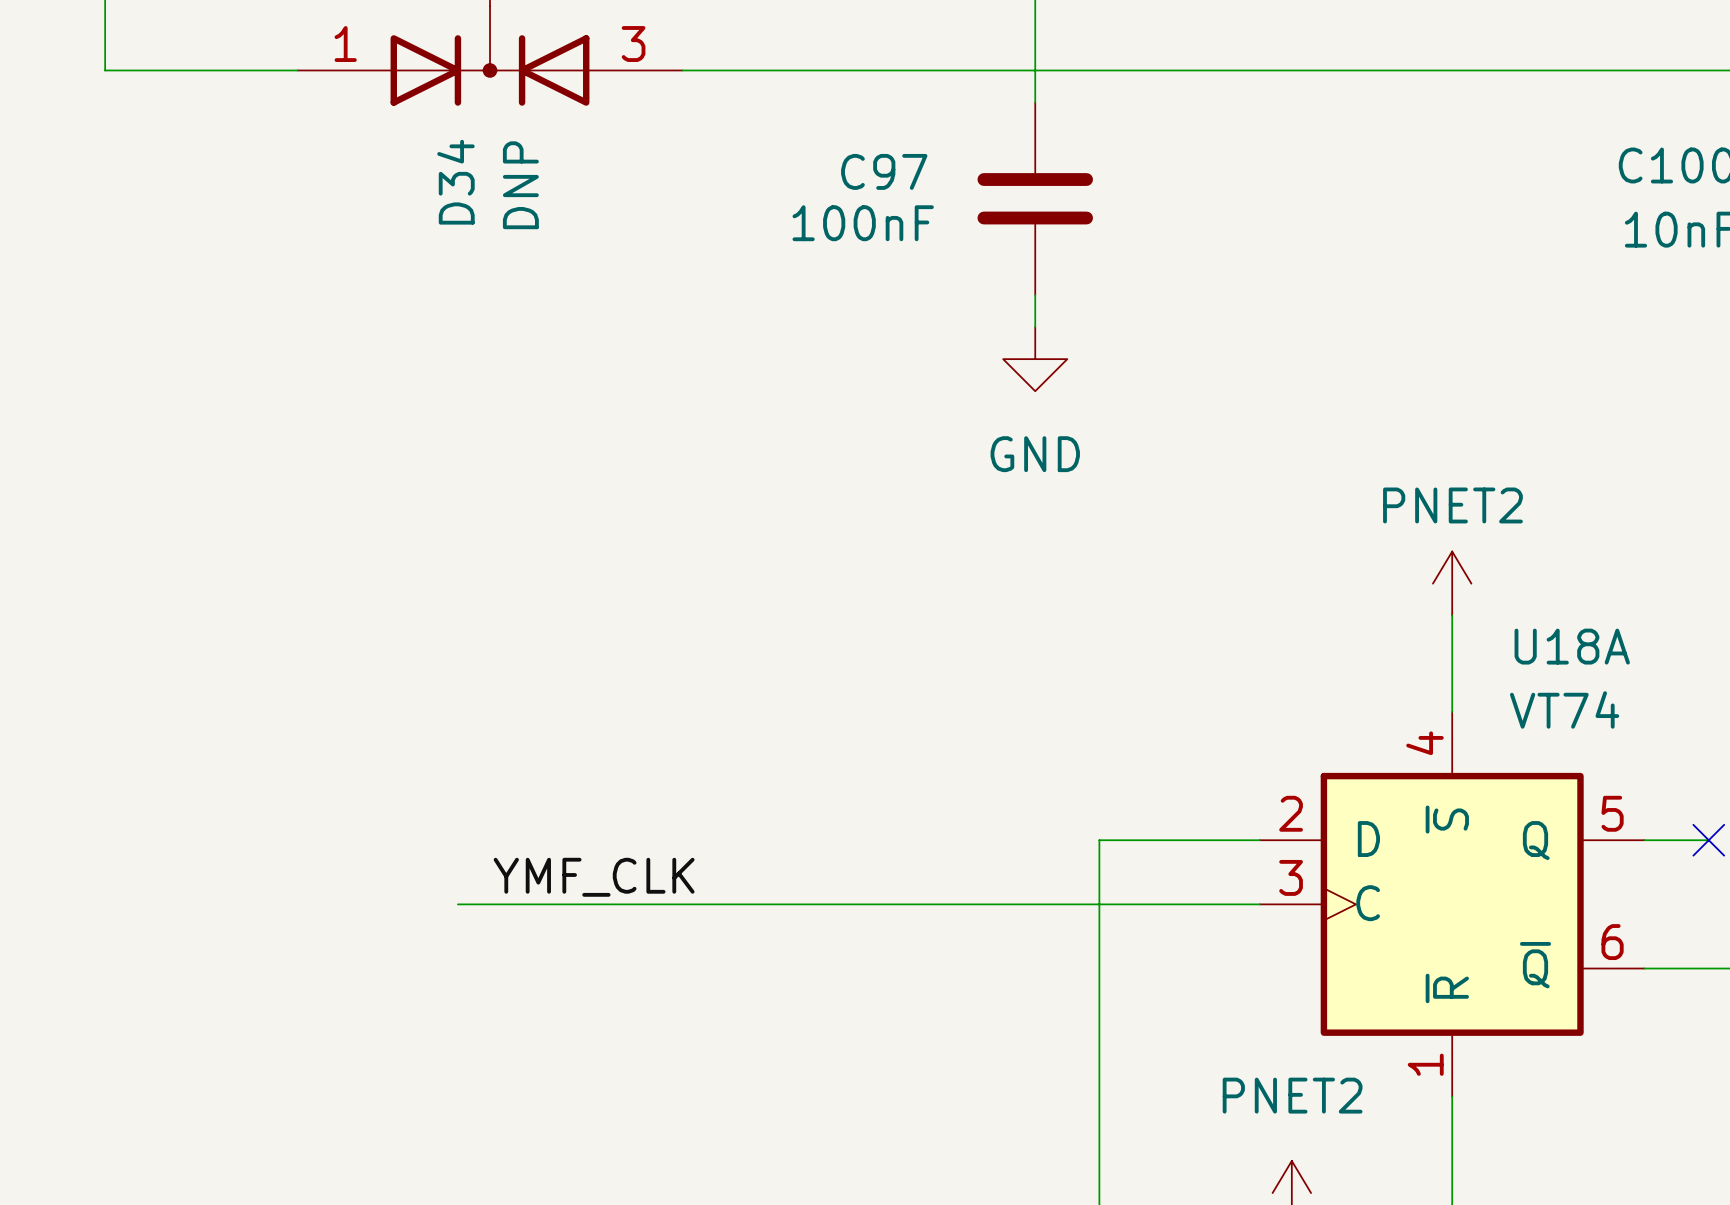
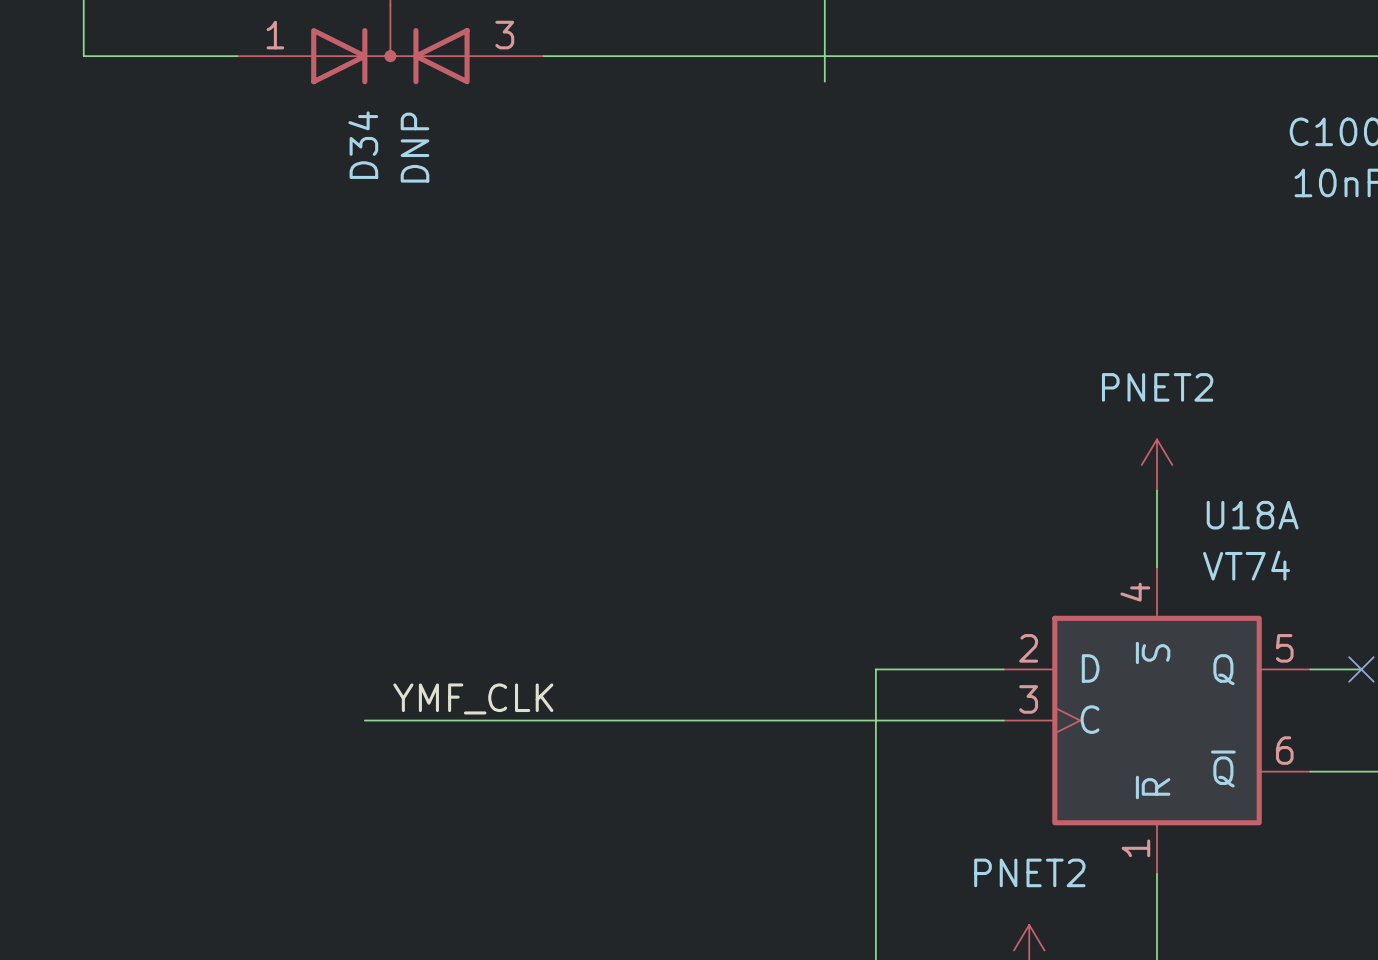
C97: 100nF (1035, 198) -> none
wire: (1035, 294) (1035, 327) -> none
power symbol: GND (1035, 359) -> none
power symbol text position: PNET2 (1452, 505) -> PNET2 (1157, 387)

